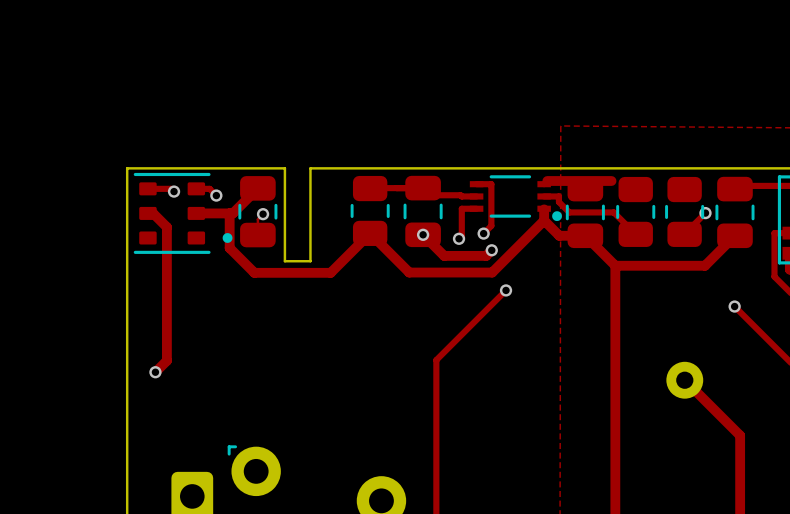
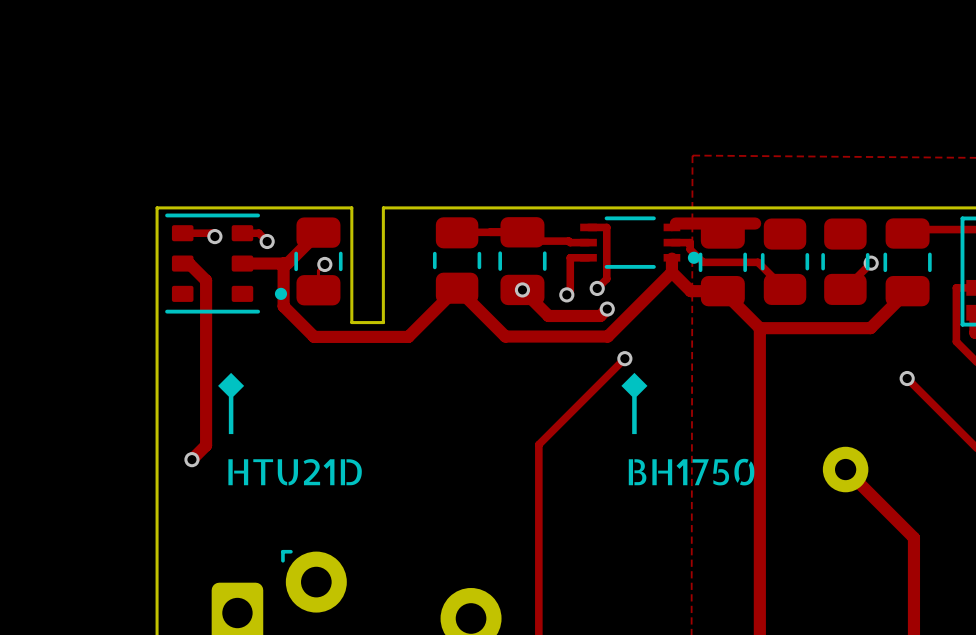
part footprint: [469, 175, 562, 222] -> [580, 216, 701, 269]
drawing: none -> [218, 372, 362, 486]
drawing: none -> [621, 372, 755, 486]

